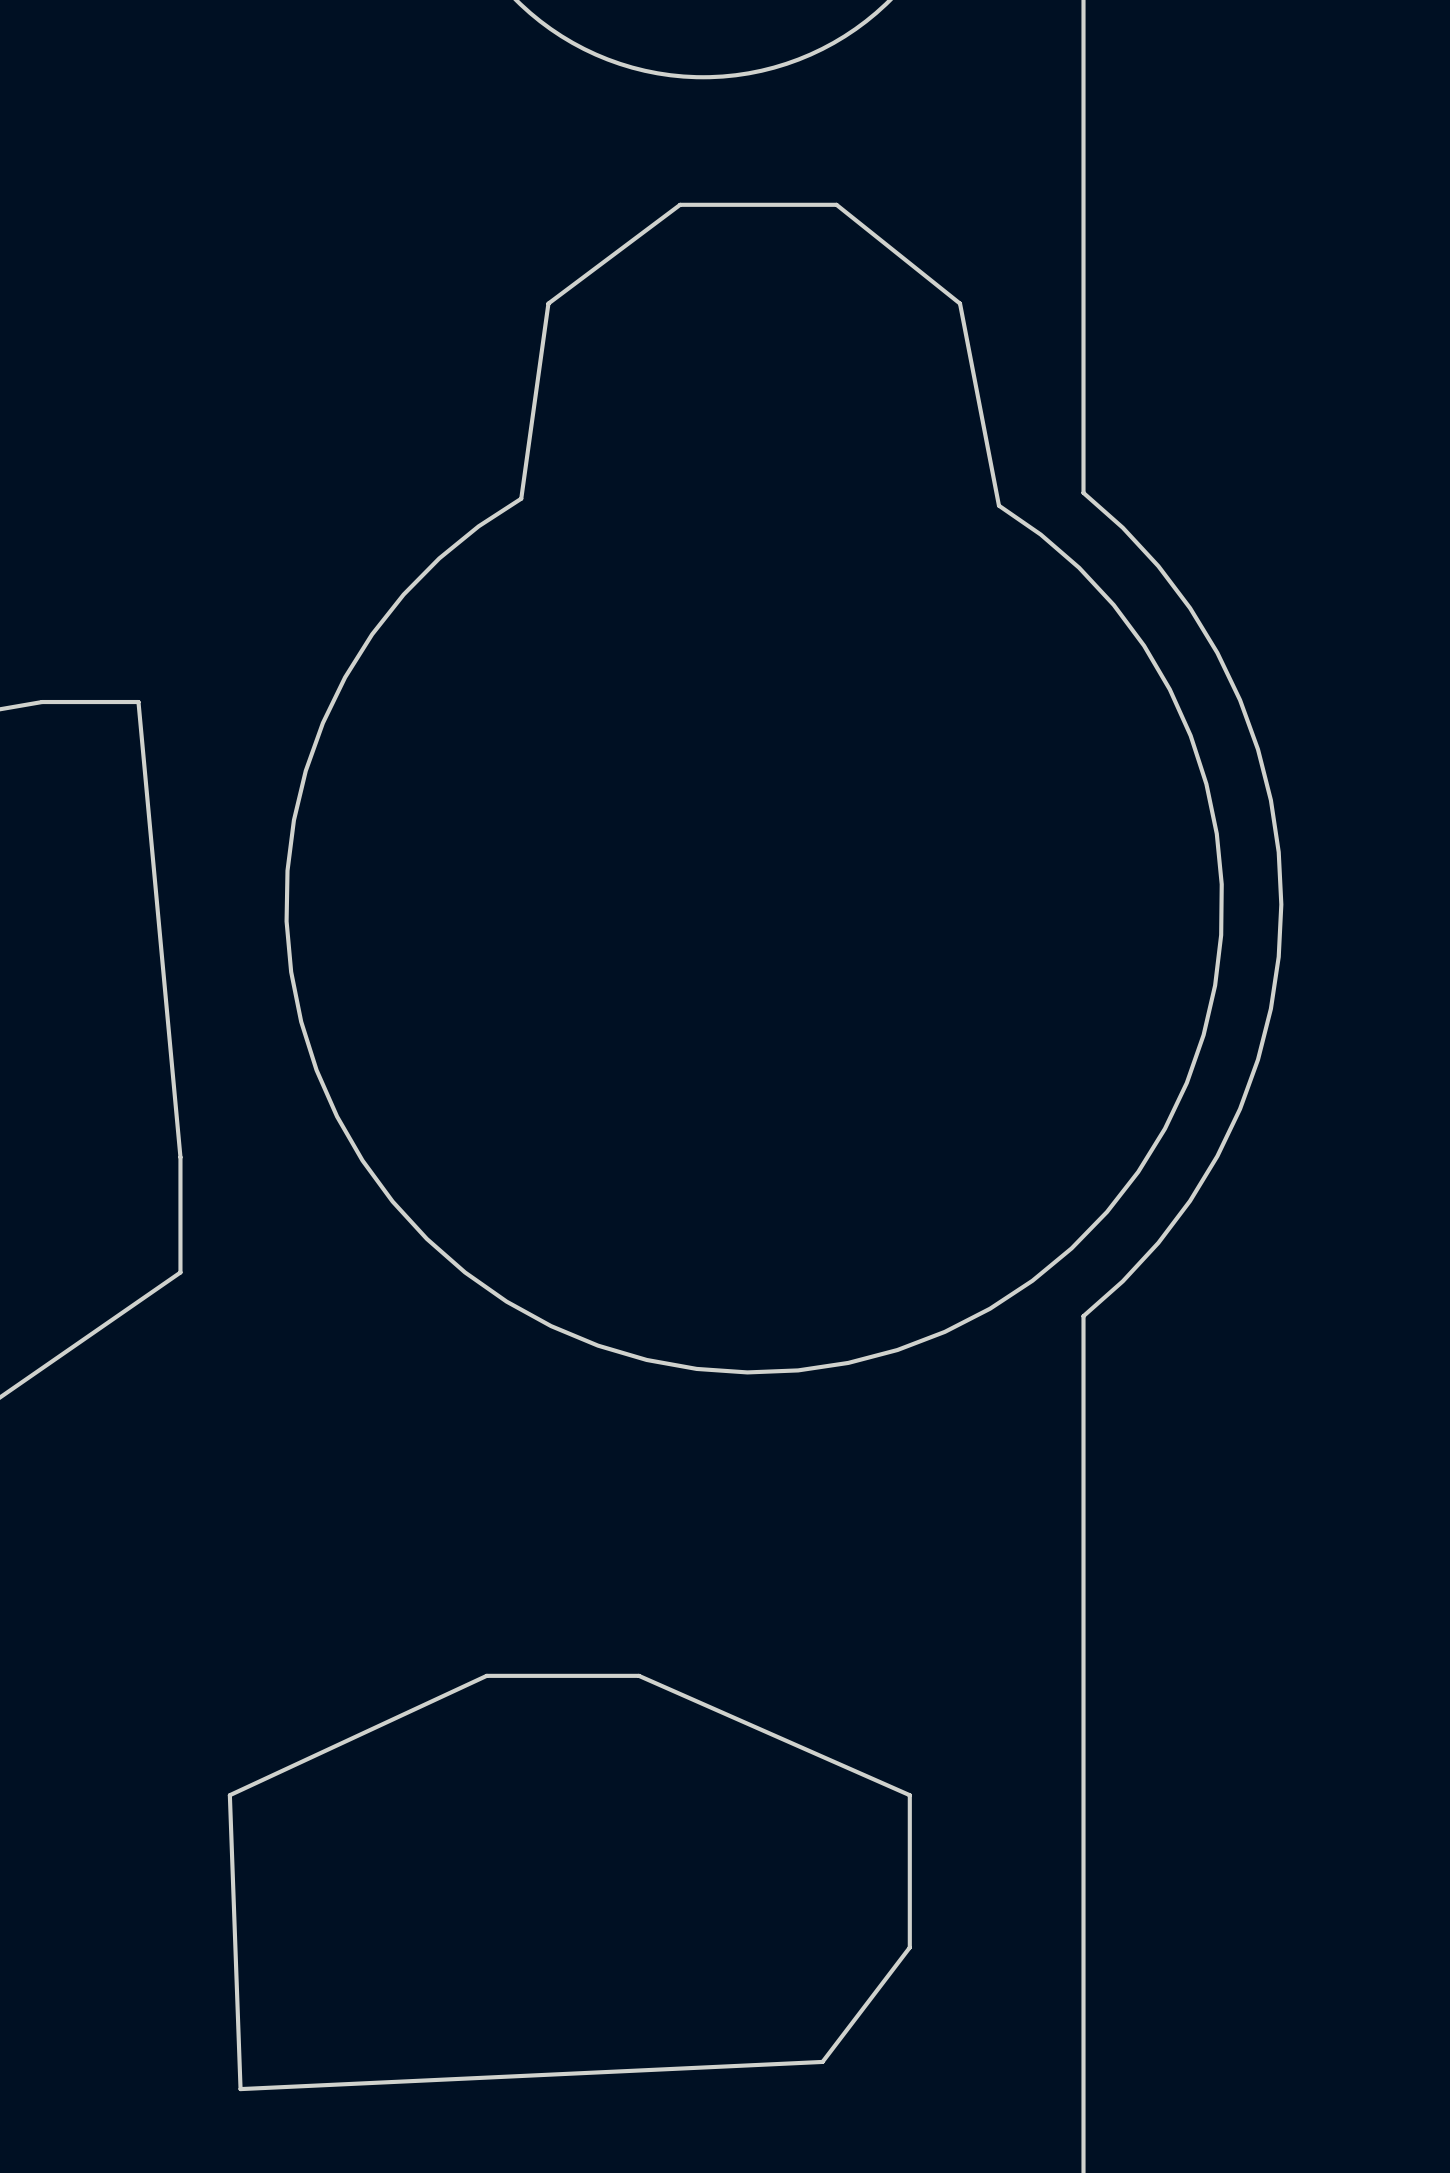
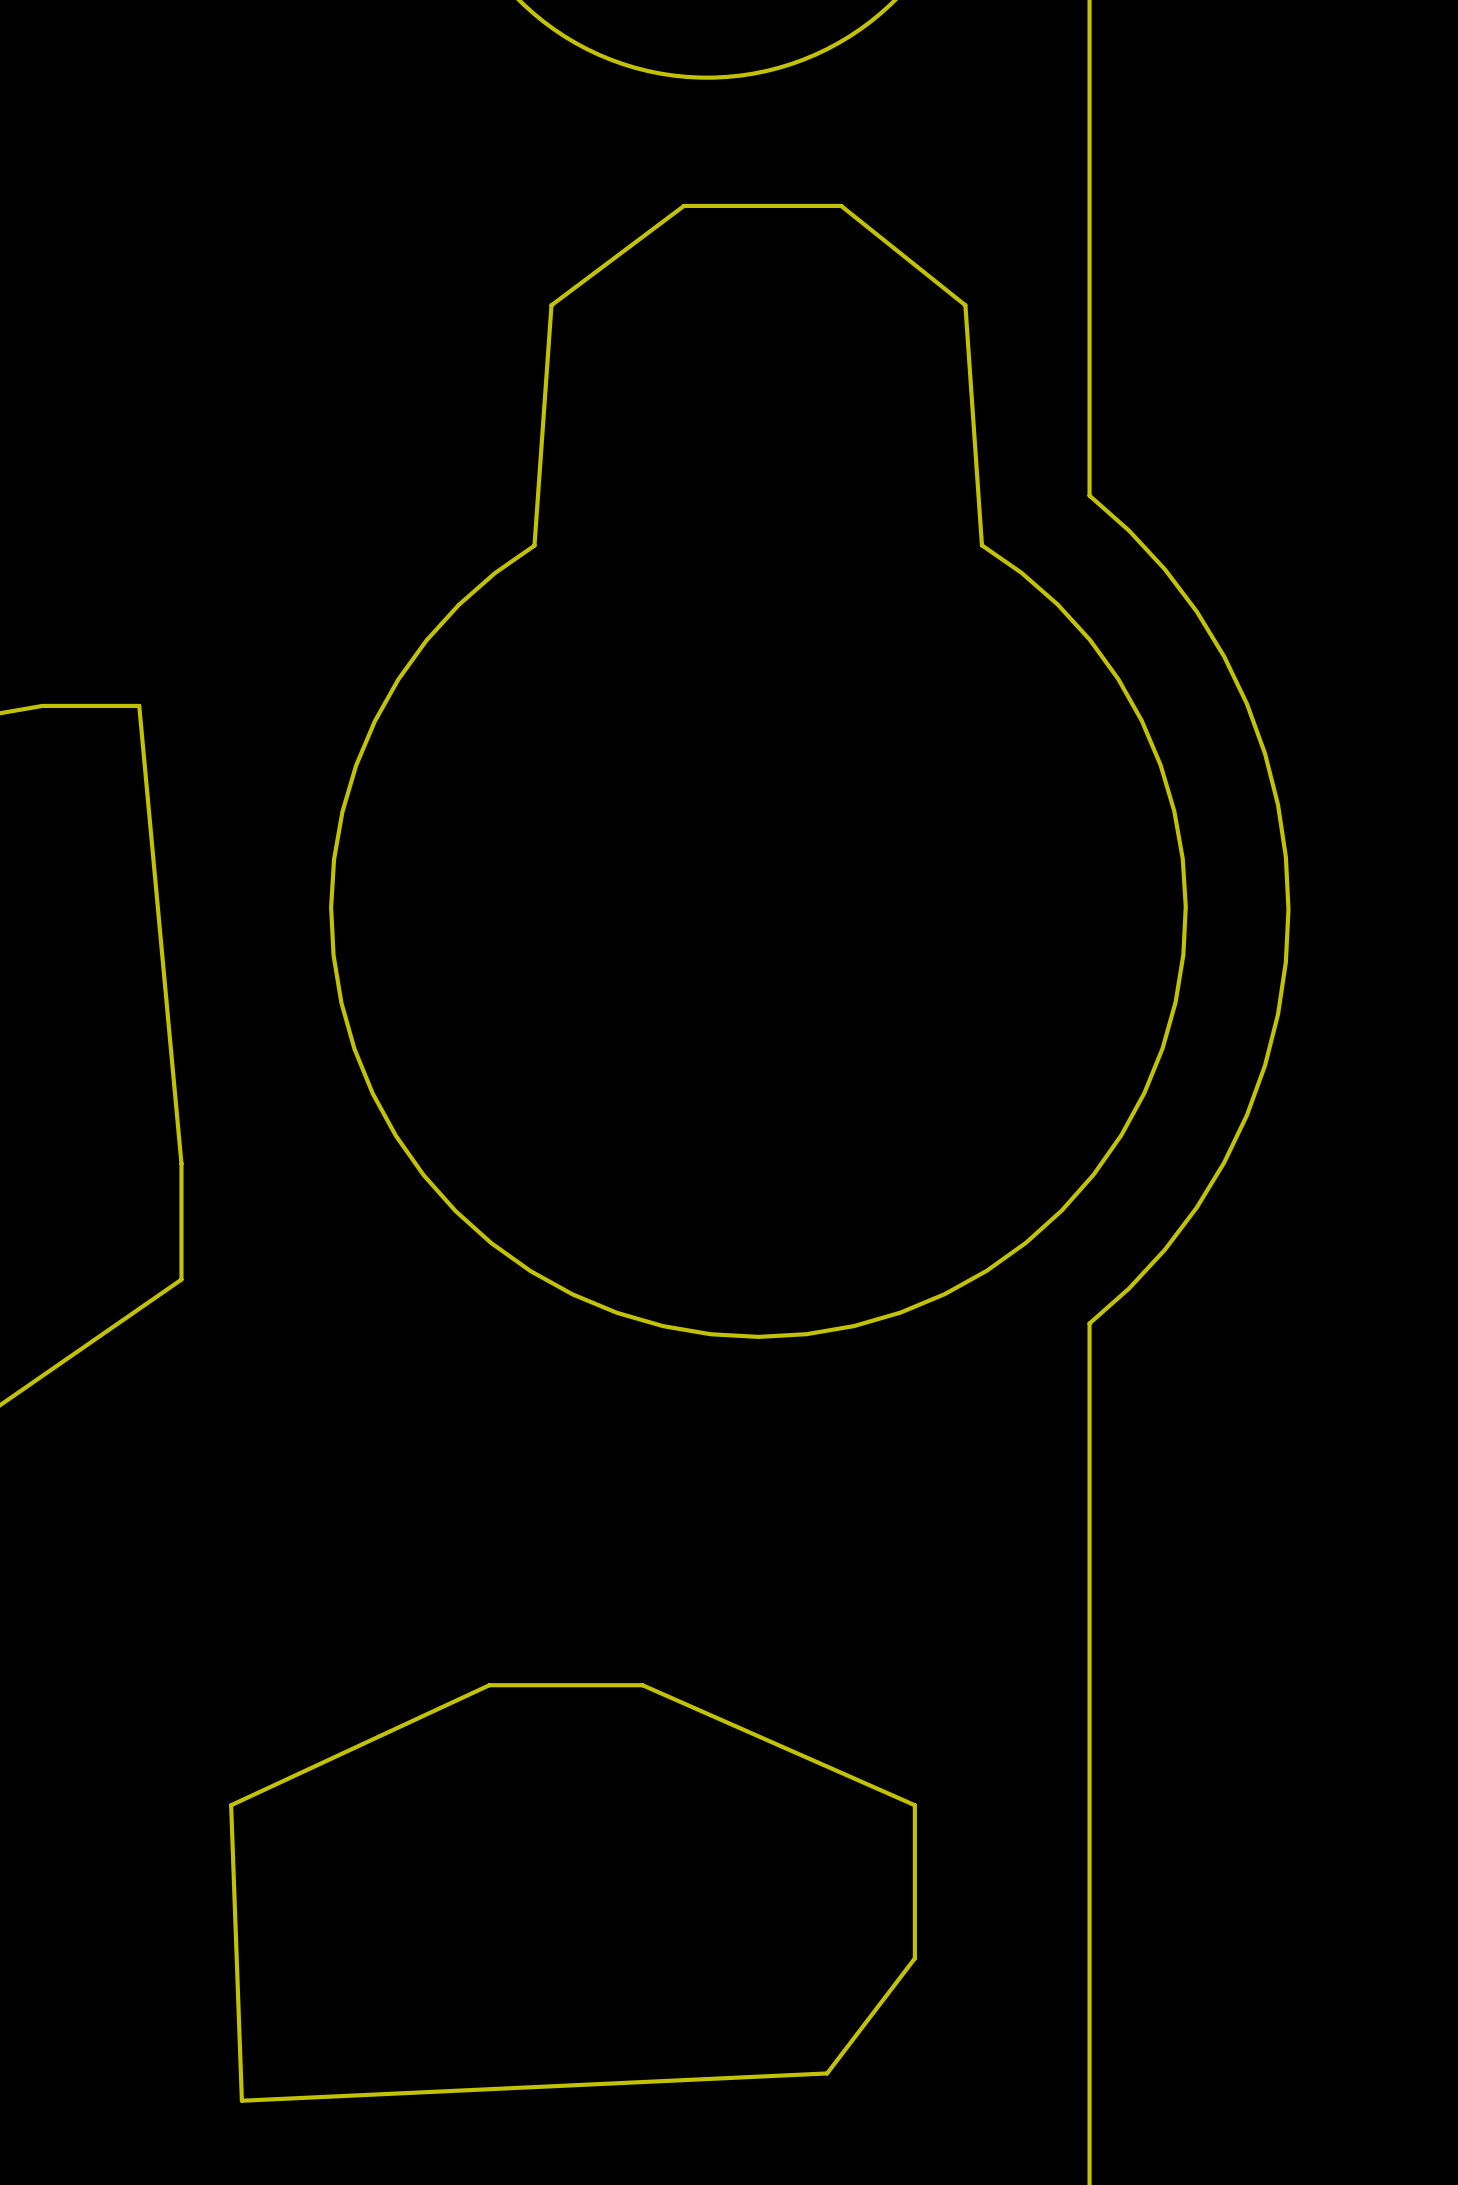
board edge: (548, 303) (521, 498) (478, 526) (439, 558) (403, 594) (372, 634) (345, 677) (322, 723) (305, 770) (293, 820) (287, 870) (286, 921) (291, 971) (301, 1021) (316, 1070) (337, 1116) (362, 1160) (392, 1201) (426, 1238) (465, 1272) (506, 1301) (551, 1326) (598, 1345) (646, 1359) (696, 1368) (747, 1372) (798, 1370) (848, 1362) (897, 1350) (944, 1331) (990, 1308) (1032, 1280) (1071, 1248) (1107, 1211) (1138, 1171) (1164, 1128) (1186, 1082) (1203, 1034) (1215, 985) (1221, 935) (1221, 884) (1216, 833) (1206, 784) (1190, 735) (1169, 689) (1144, 645) (1113, 604) (1079, 567) (1040, 534) (998, 505) (960, 303) -> (551, 305) (534, 545) (494, 573) (458, 604) (426, 640) (398, 679) (374, 721) (356, 765) (342, 811) (334, 859) (331, 907) (333, 955) (341, 1002) (354, 1049) (372, 1093) (395, 1135) (423, 1175) (455, 1211) (491, 1243) (530, 1271) (572, 1294) (617, 1312) (663, 1326) (710, 1334) (758, 1336) (806, 1334) (854, 1326) (900, 1312) (944, 1294) (986, 1270) (1025, 1242) (1061, 1210) (1093, 1174) (1121, 1135) (1144, 1093) (1162, 1048) (1175, 1002) (1183, 954) (1185, 906) (1182, 858) (1174, 811) (1160, 765) (1141, 720) (1118, 679) (1090, 640) (1057, 604) (1021, 572) (981, 545) (965, 305)

